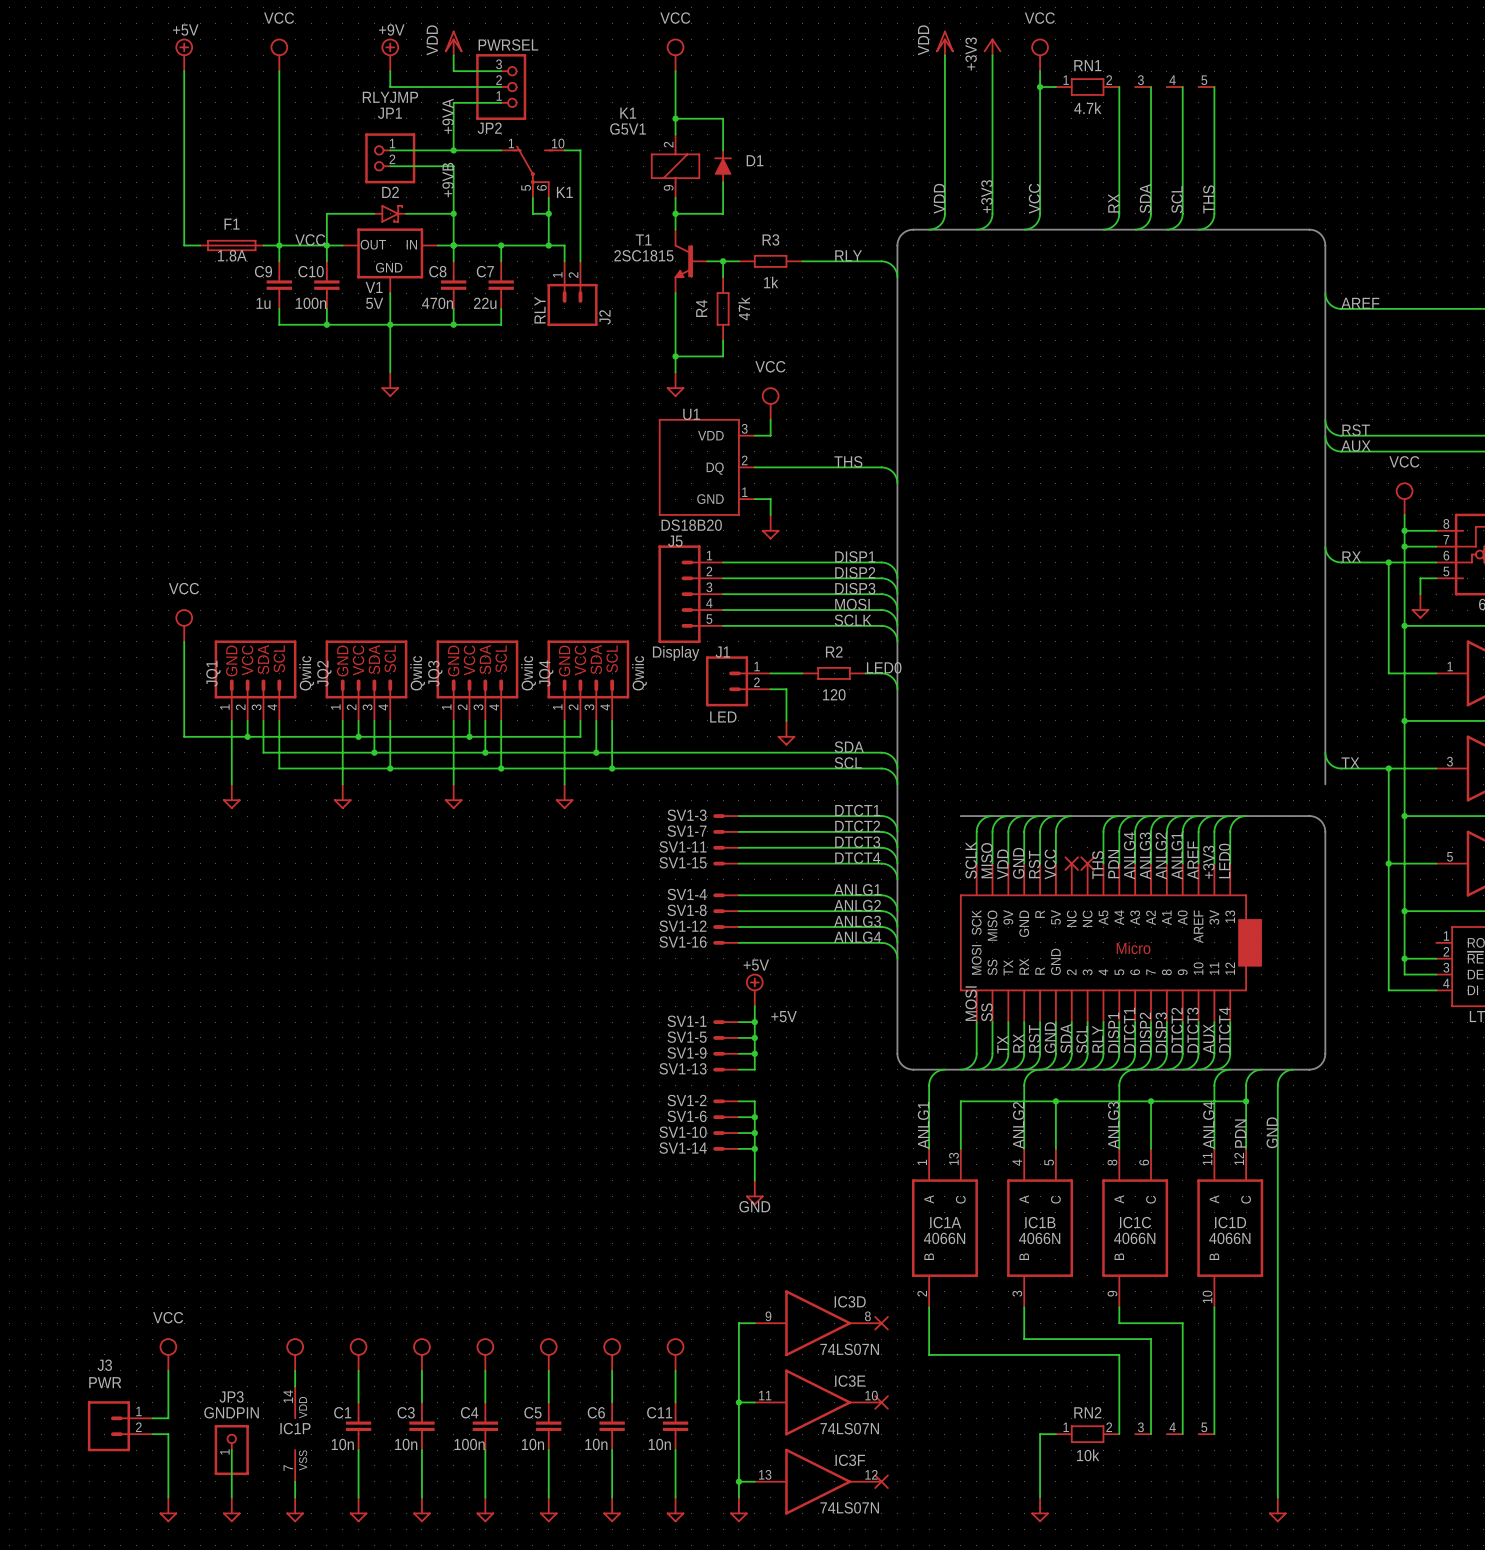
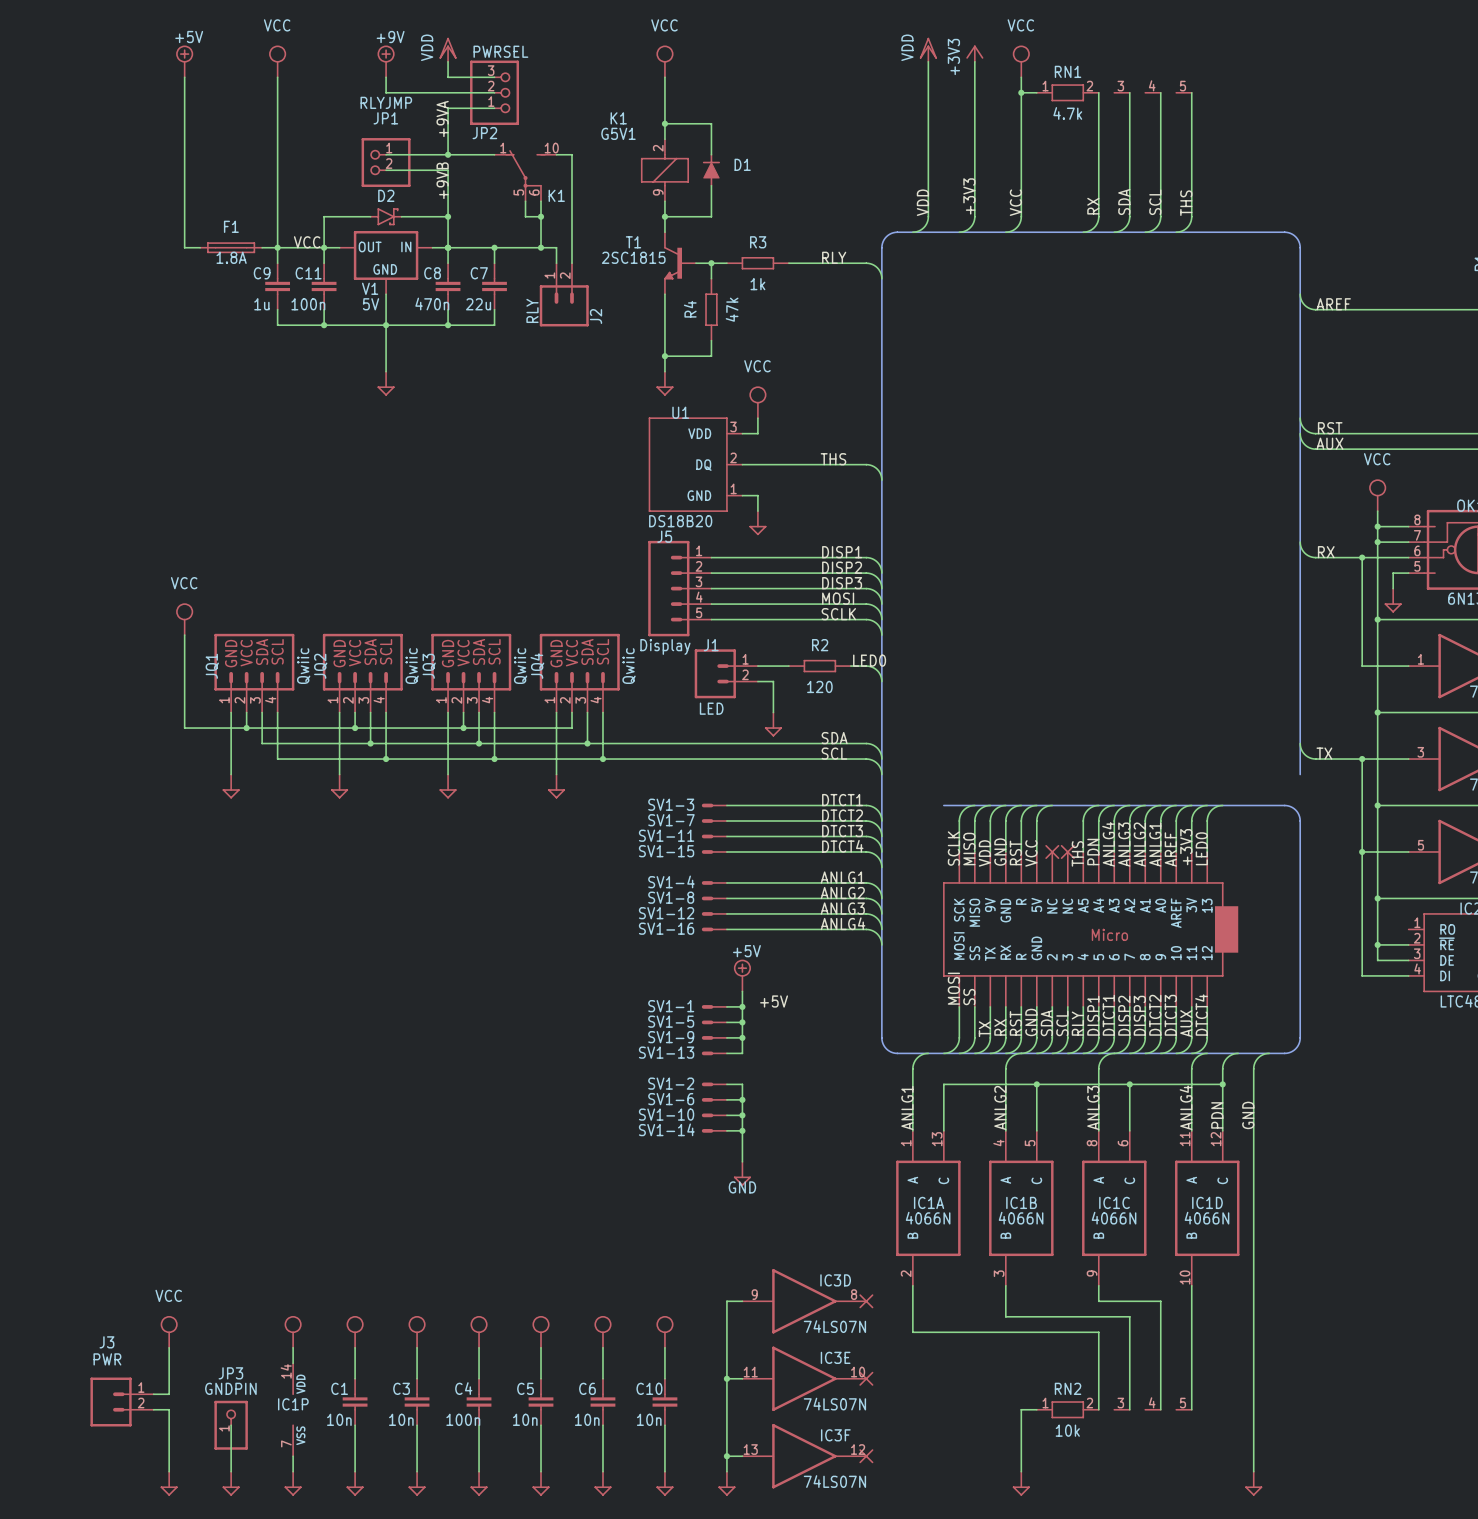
C10 name: C10 (311, 271) -> C11 (308, 273)
C11 name: C11 (659, 1412) -> C10 (649, 1388)

